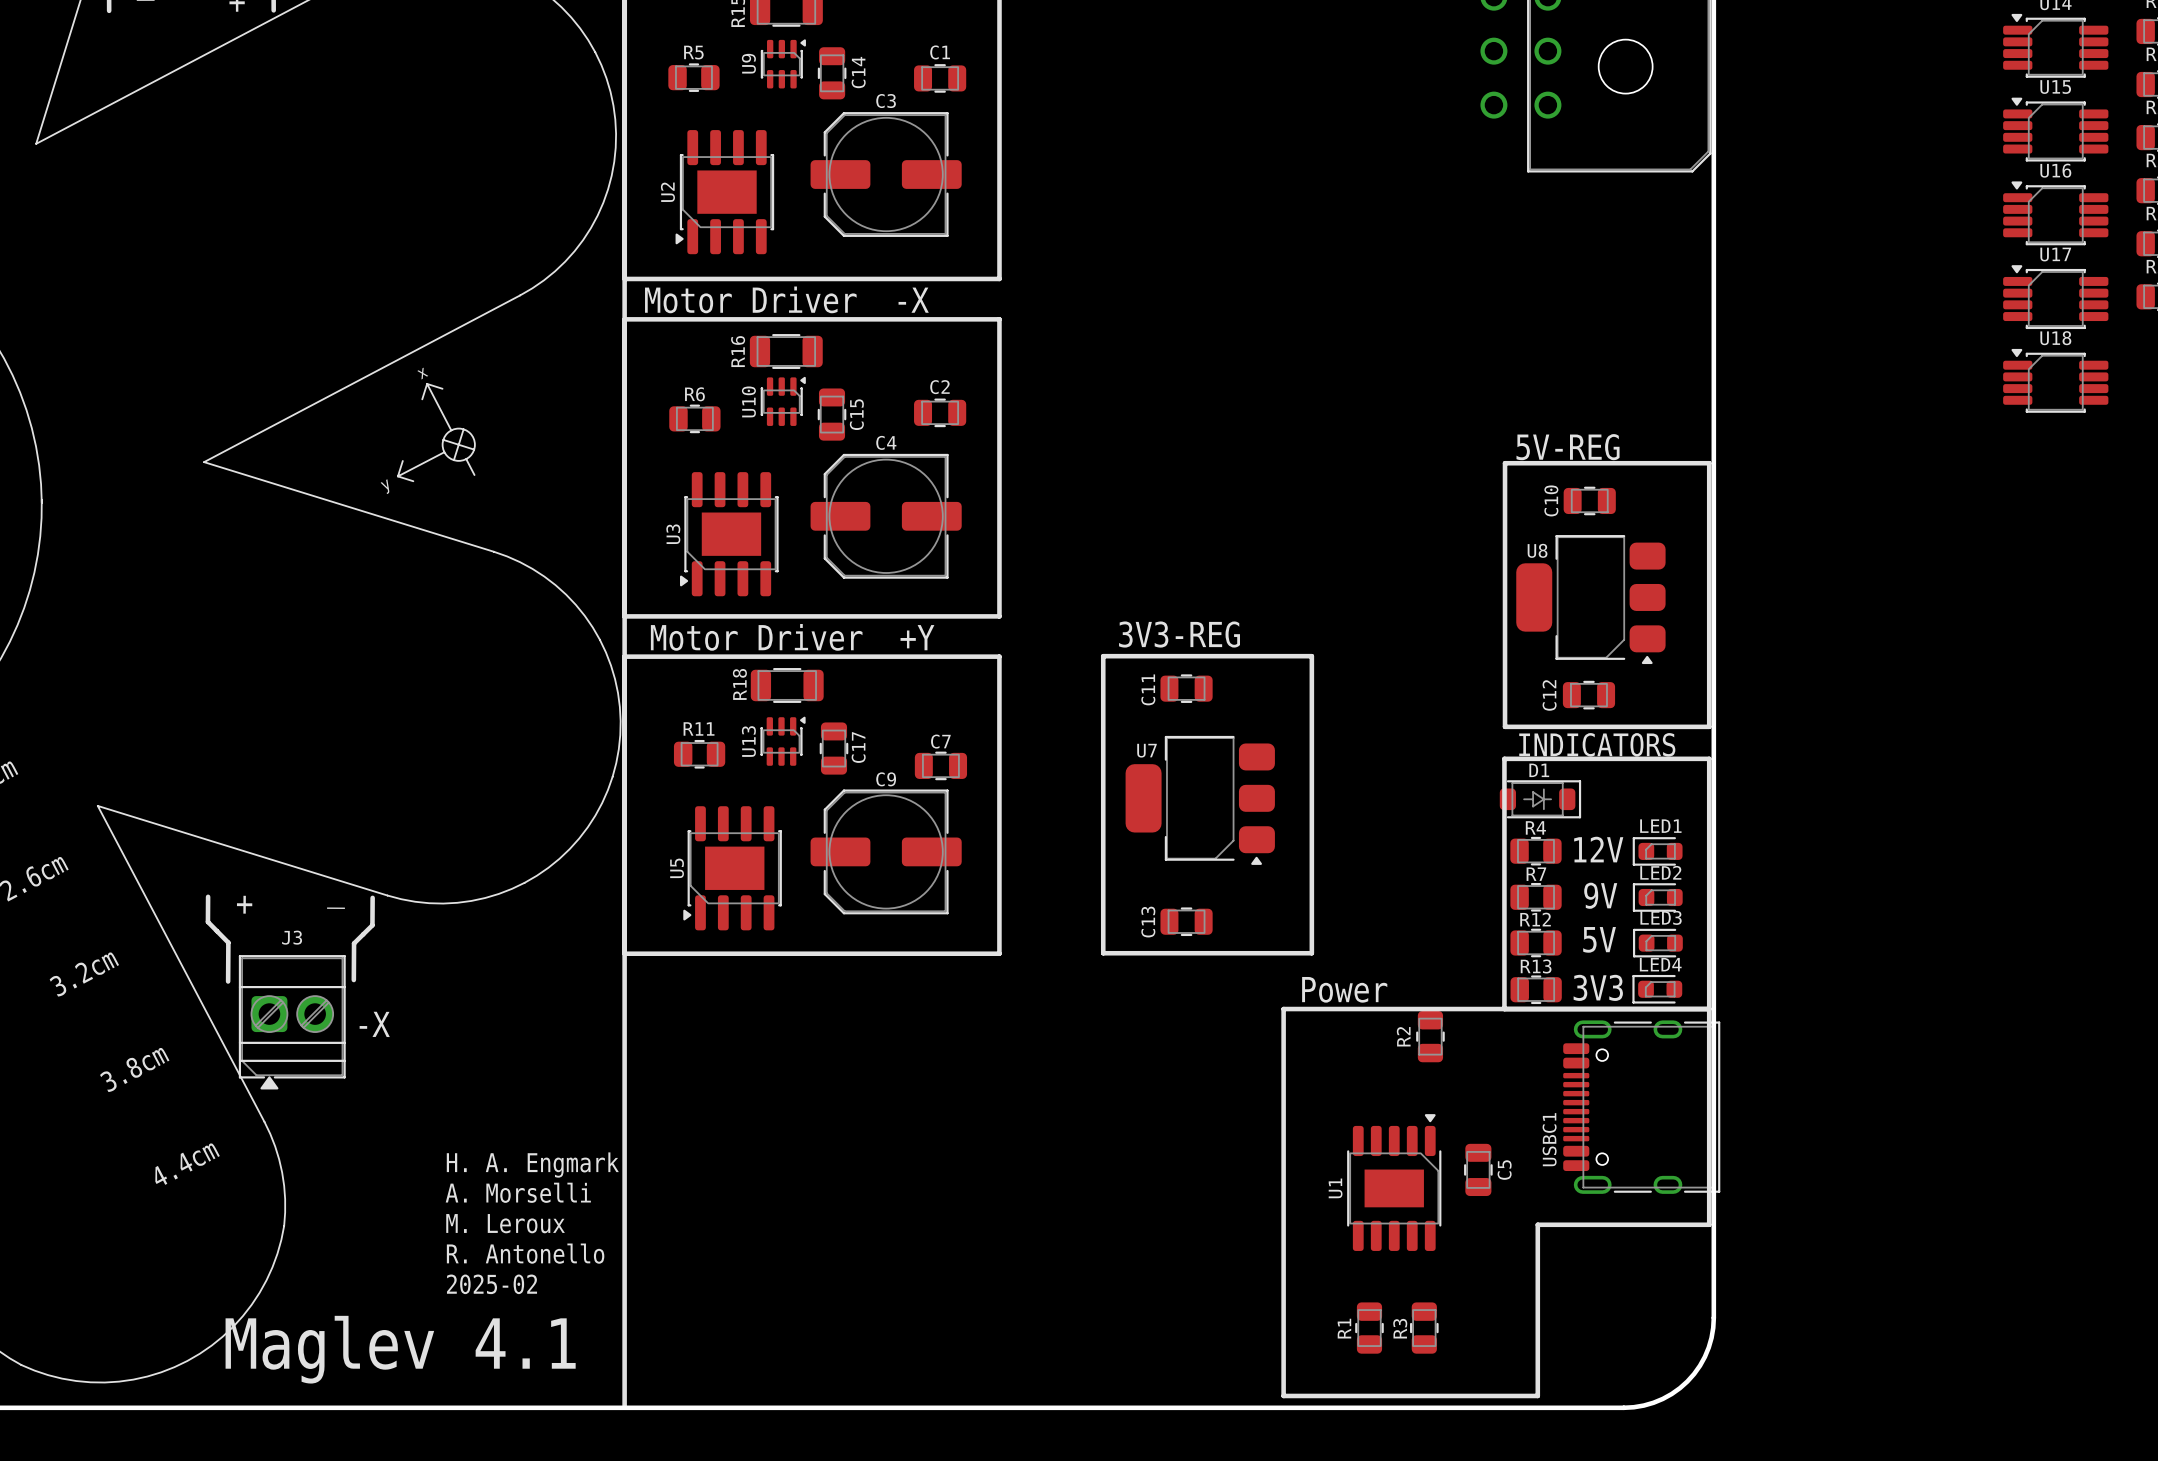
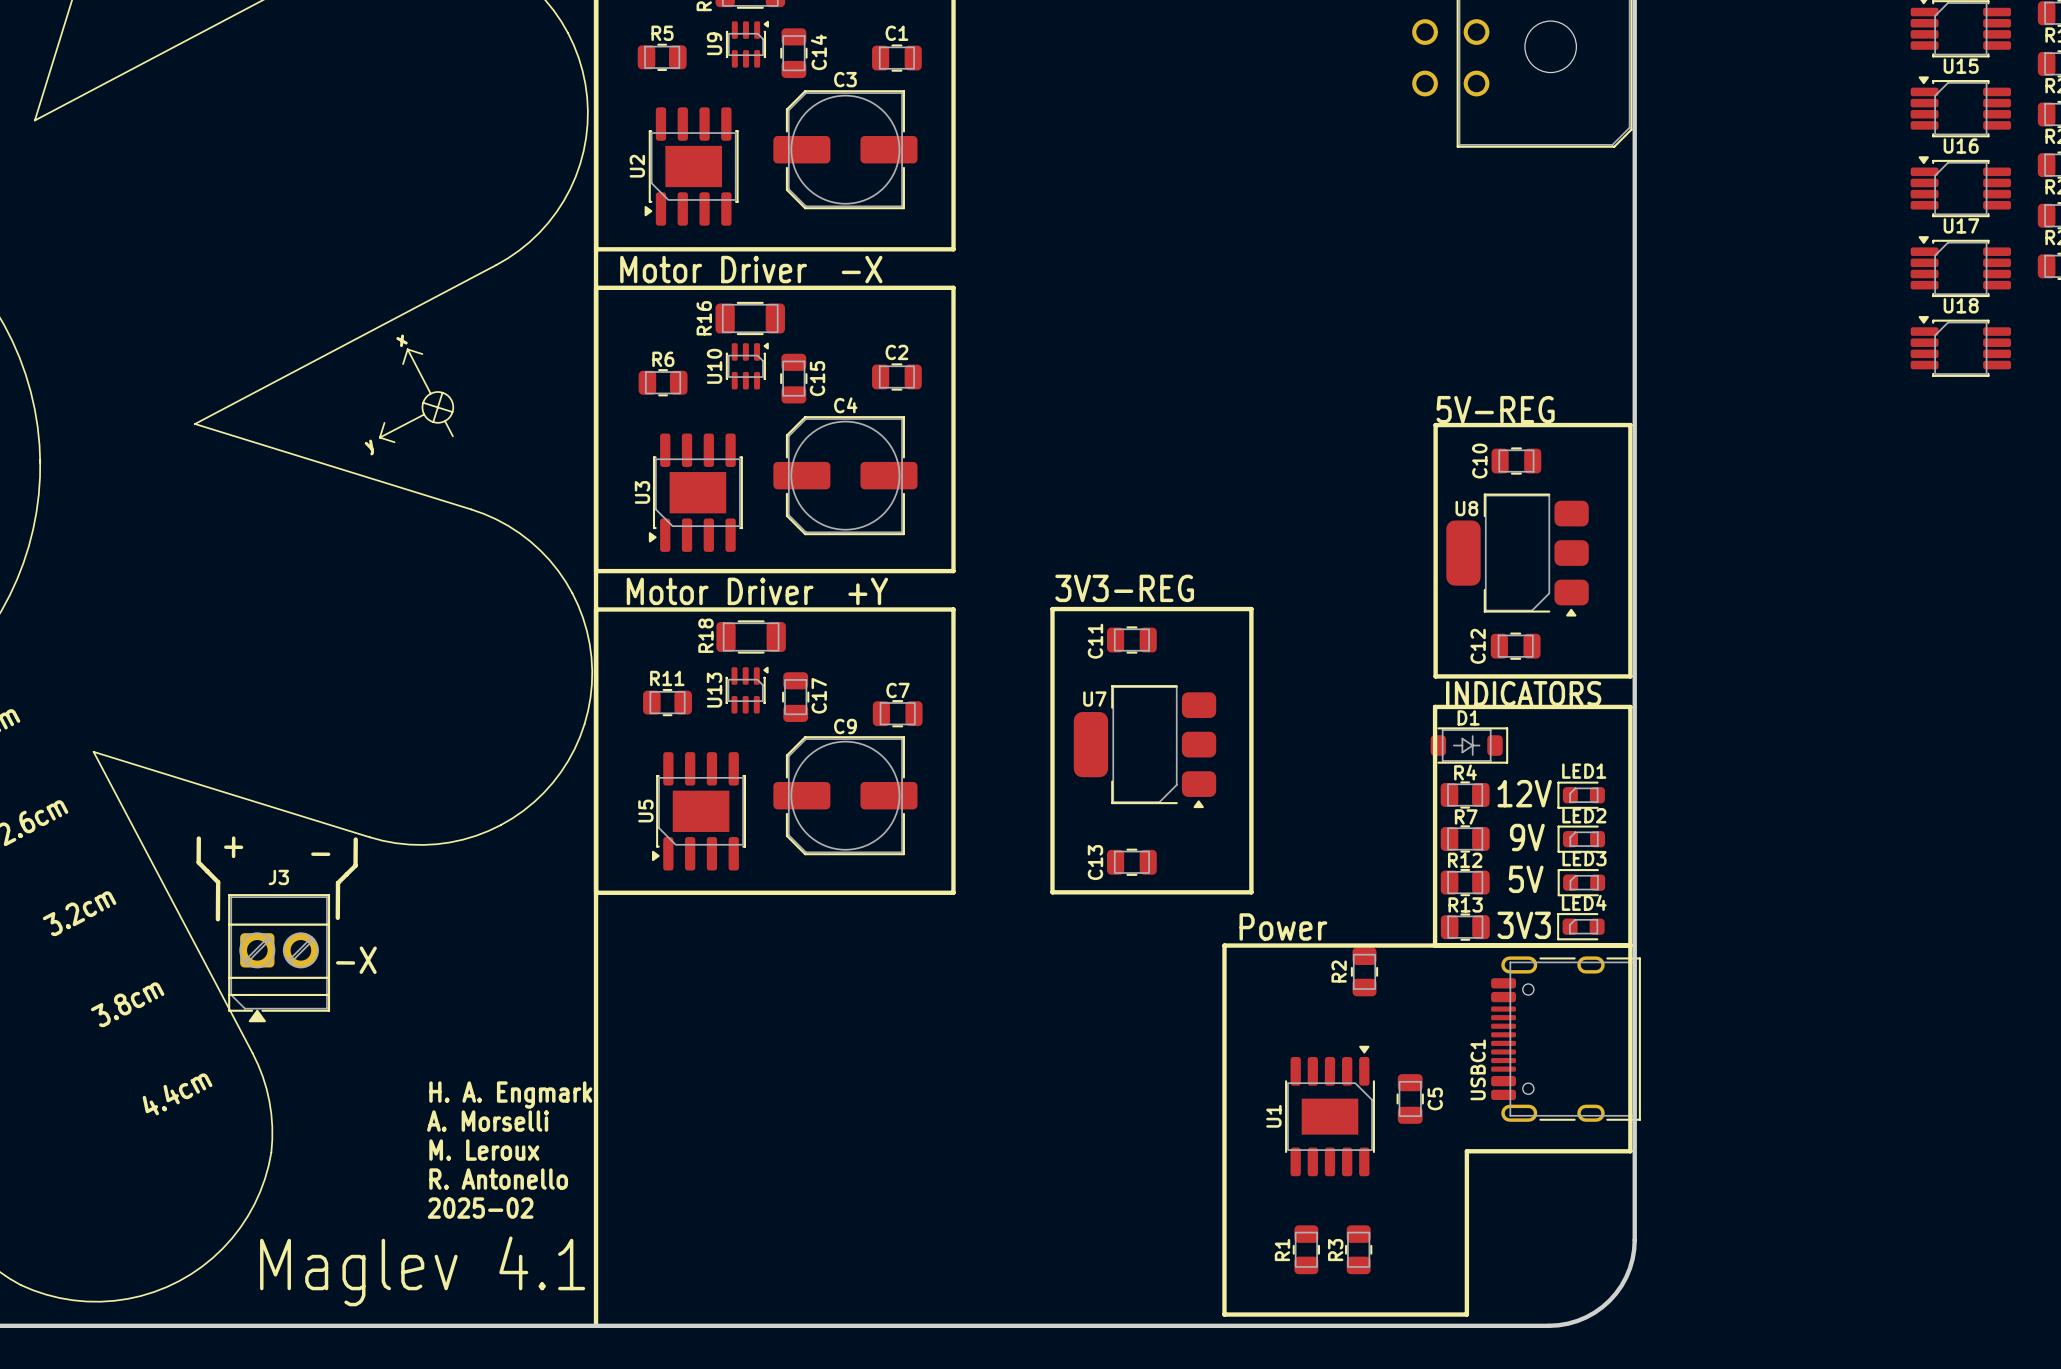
text position: Maglev 4.1 (400, 1349) -> Maglev 4.1 (422, 1271)

